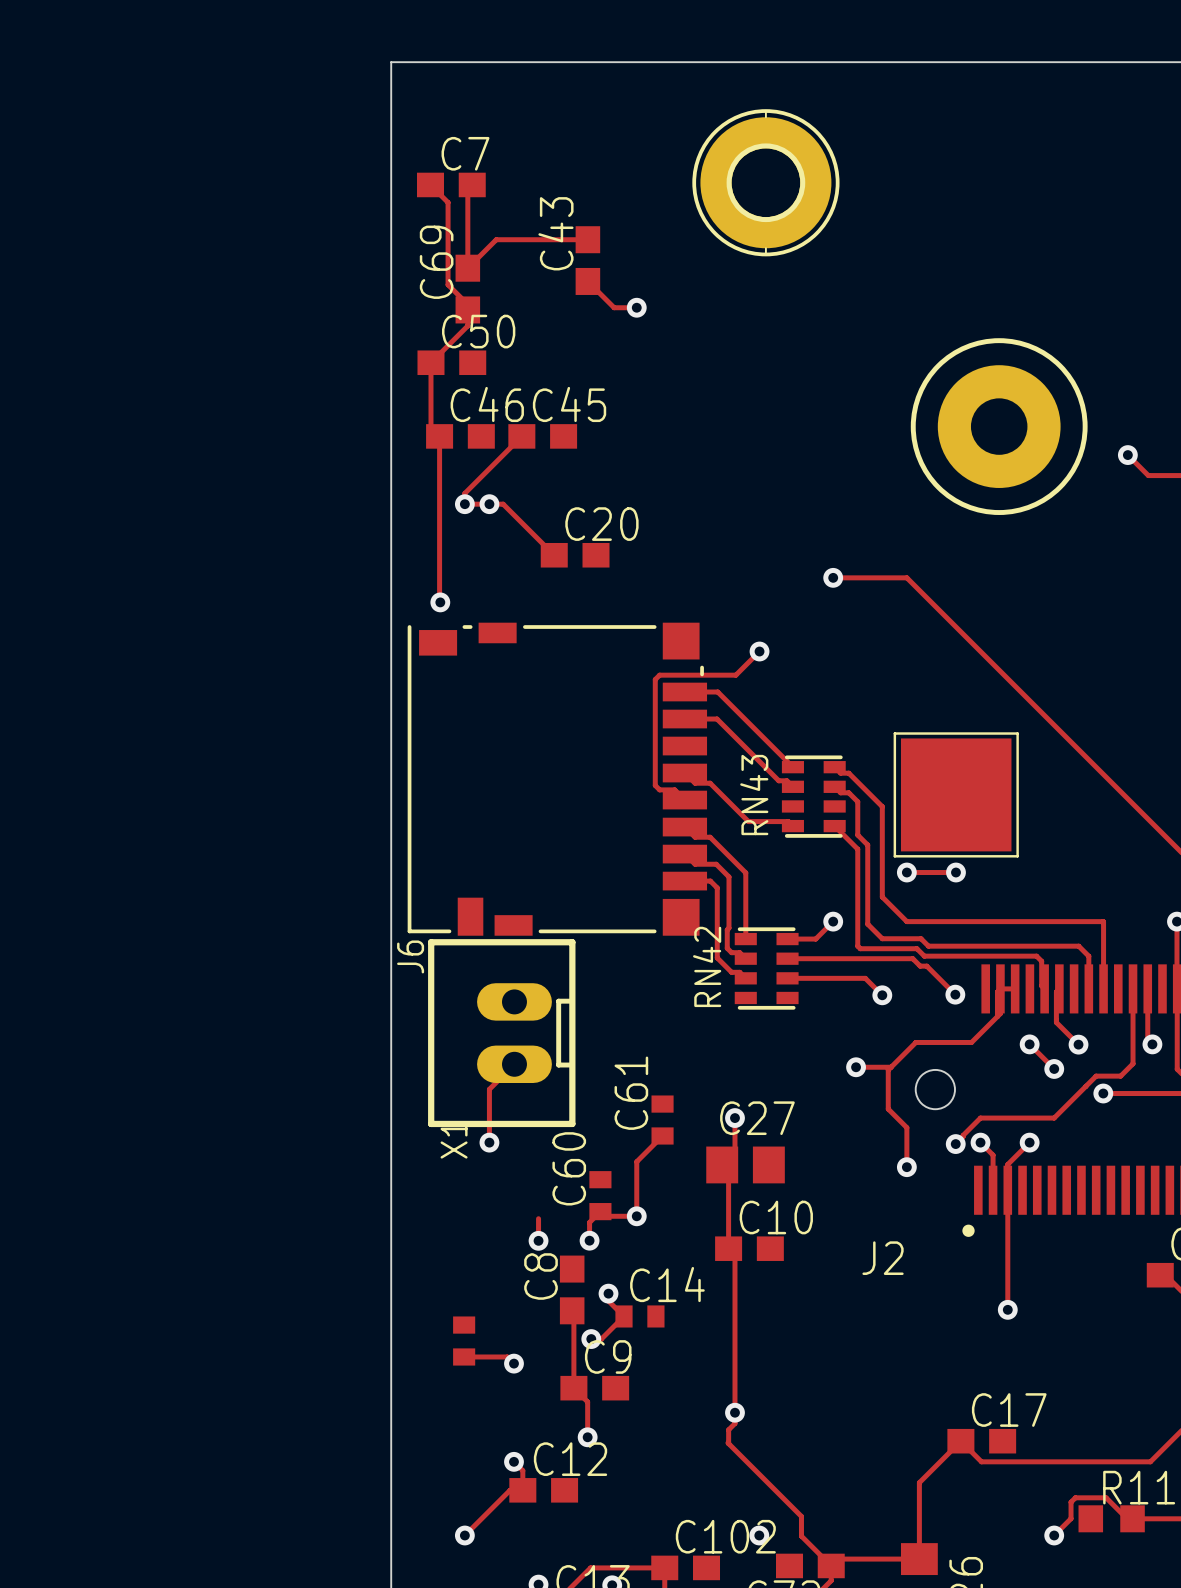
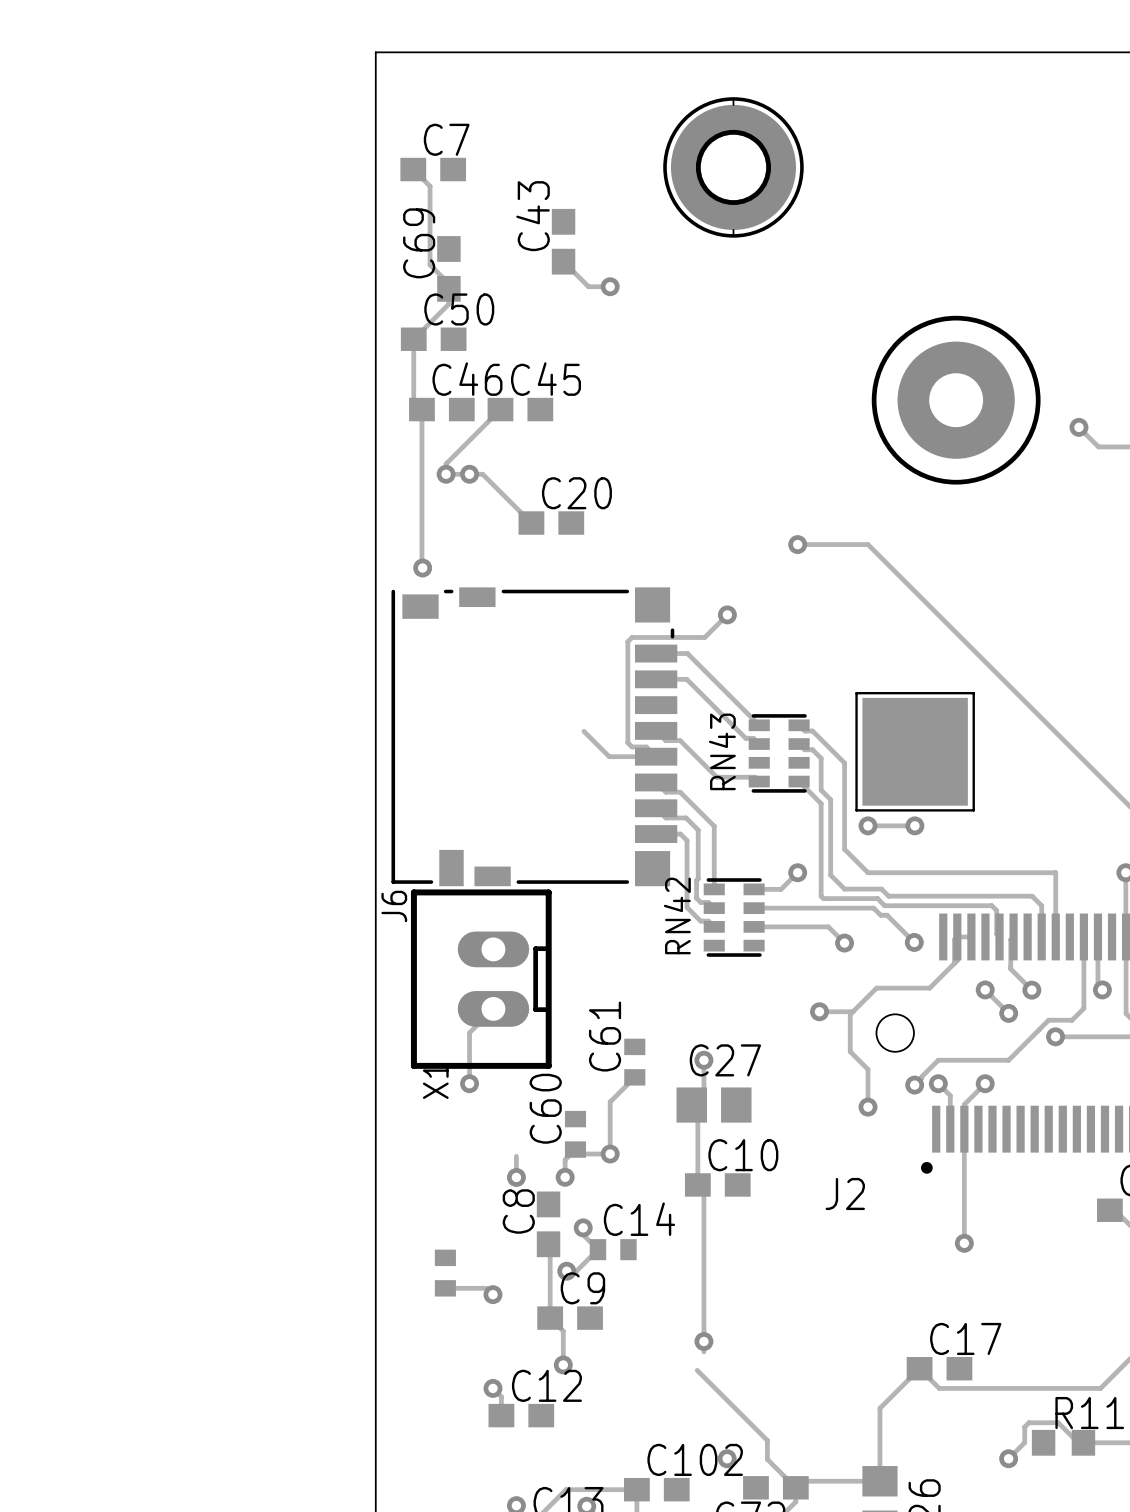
track: (472, 184) (467, 189) (467, 268) (496, 239) (587, 239) -> none
track: none -> (583, 731) (609, 756) (656, 756)
track: (734, 1423) (728, 1429) (728, 1443) -> none
track: (522, 1490) (510, 1490) (464, 1535) -> none
via: (464, 1535) -> none

